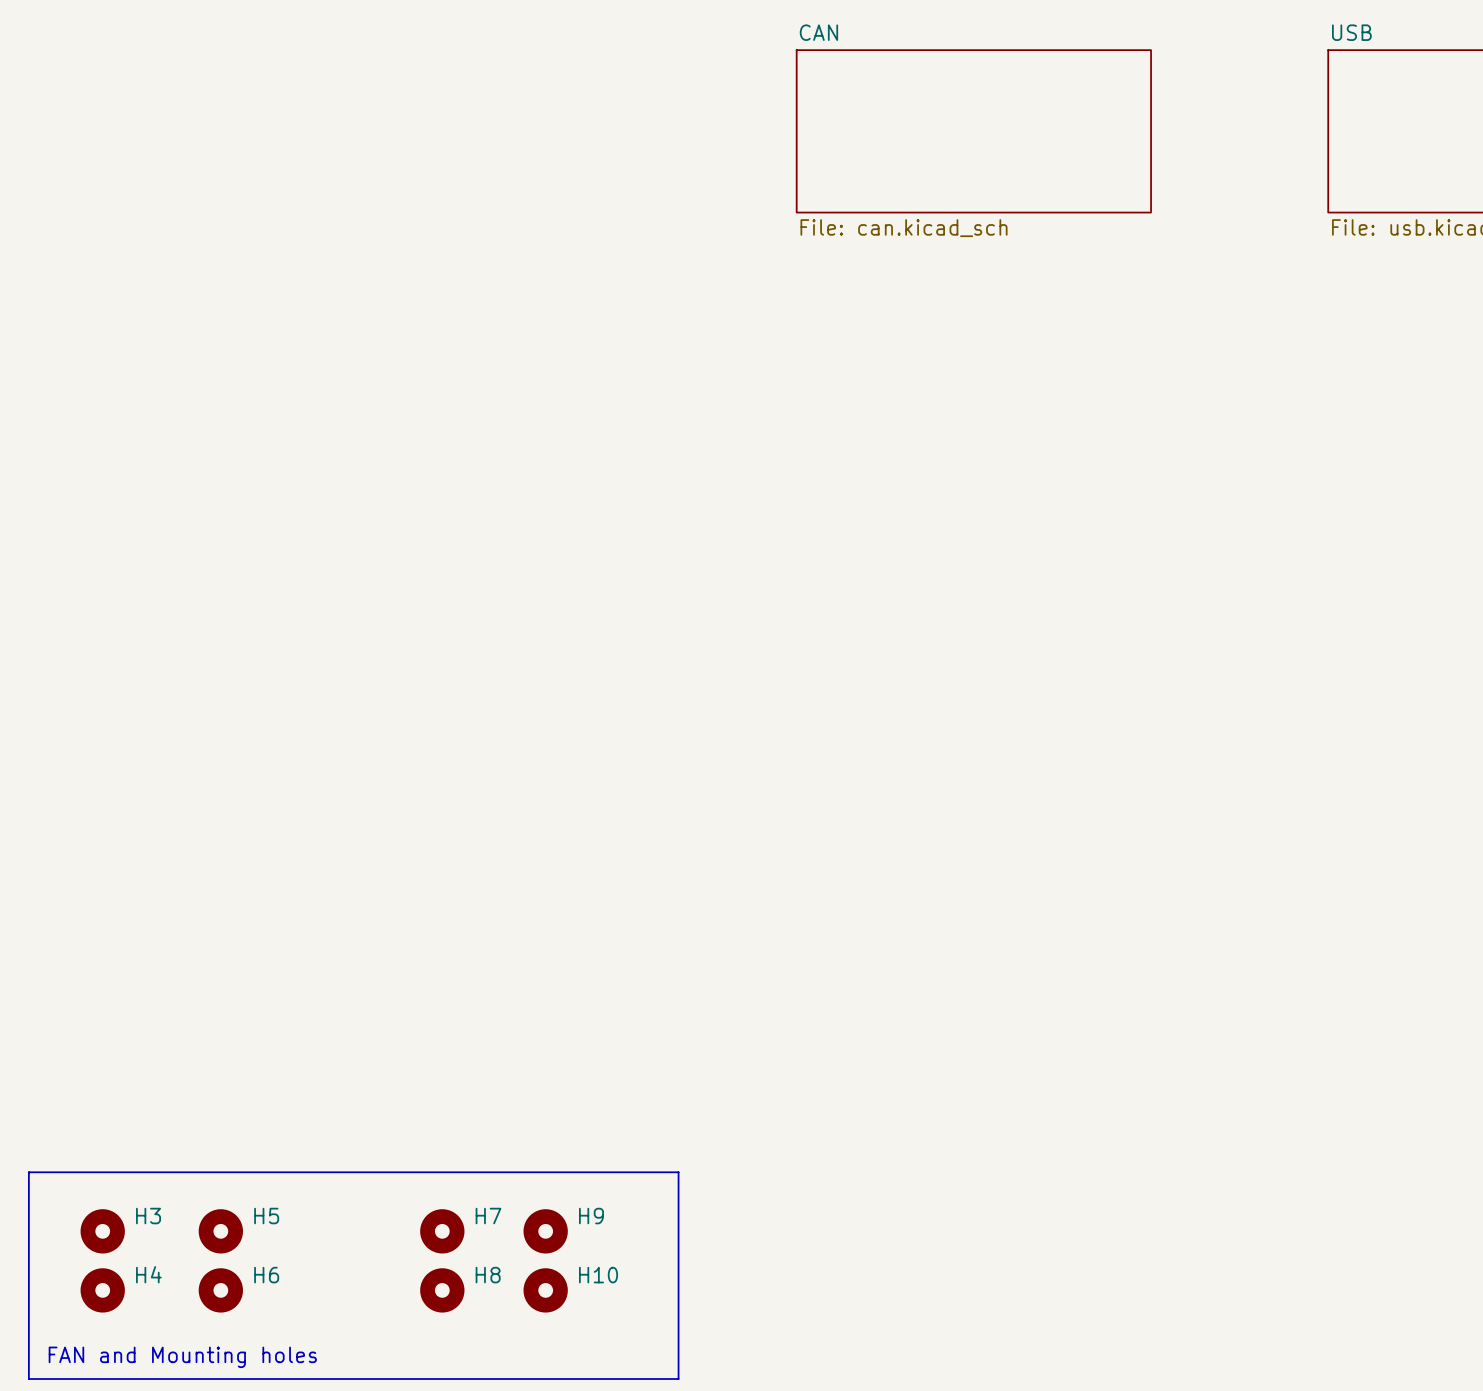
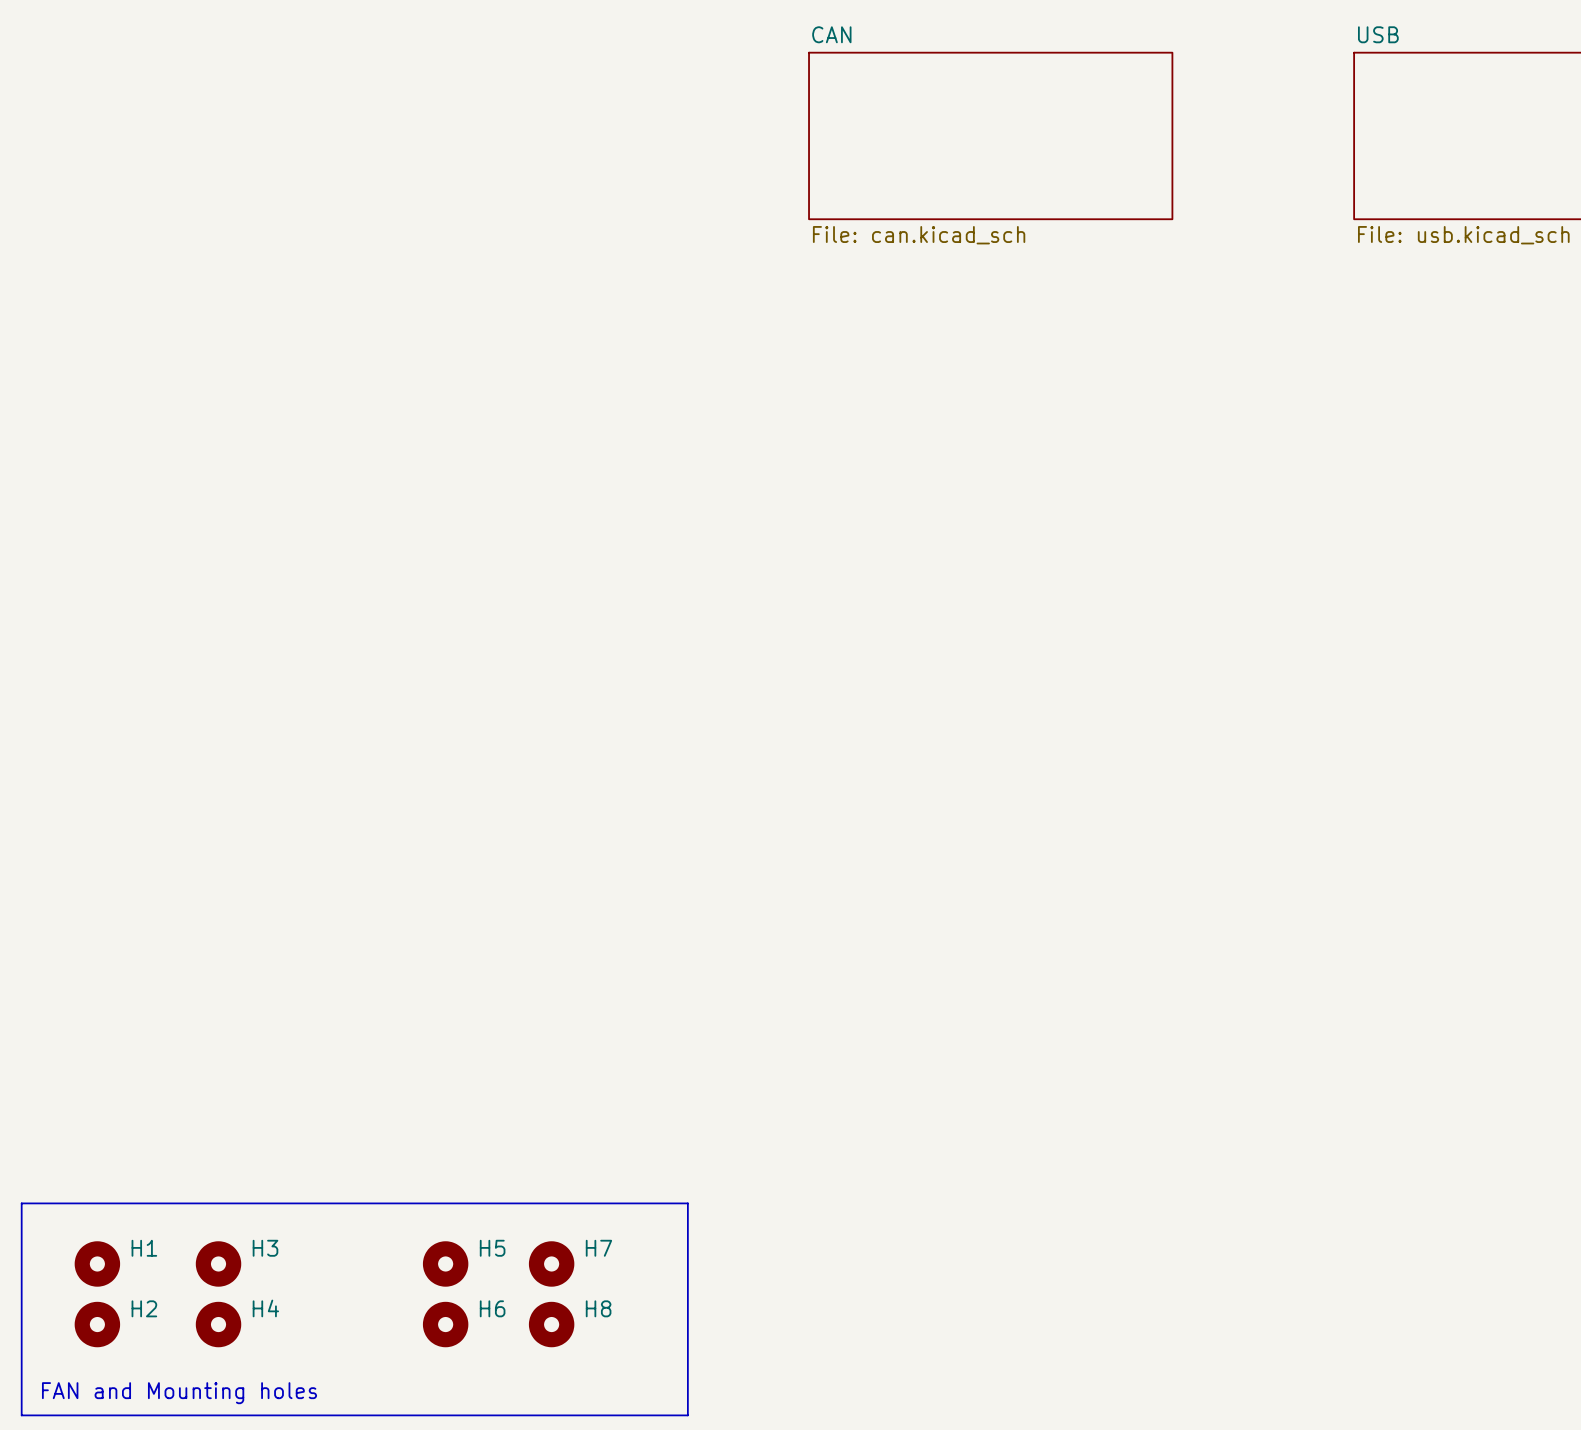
H3 name: H3 (148, 1216) -> H1 (144, 1248)
H5 name: H5 (266, 1216) -> H3 (265, 1248)
H7 name: H7 (488, 1216) -> H5 (492, 1248)
H9 name: H9 (591, 1216) -> H7 (598, 1248)
H4 name: H4 (148, 1274) -> H2 (144, 1308)
H6 name: H6 (266, 1275) -> H4 (265, 1308)
H8 name: H8 (488, 1275) -> H6 (492, 1308)
H10 name: H10 (598, 1275) -> H8 (598, 1308)

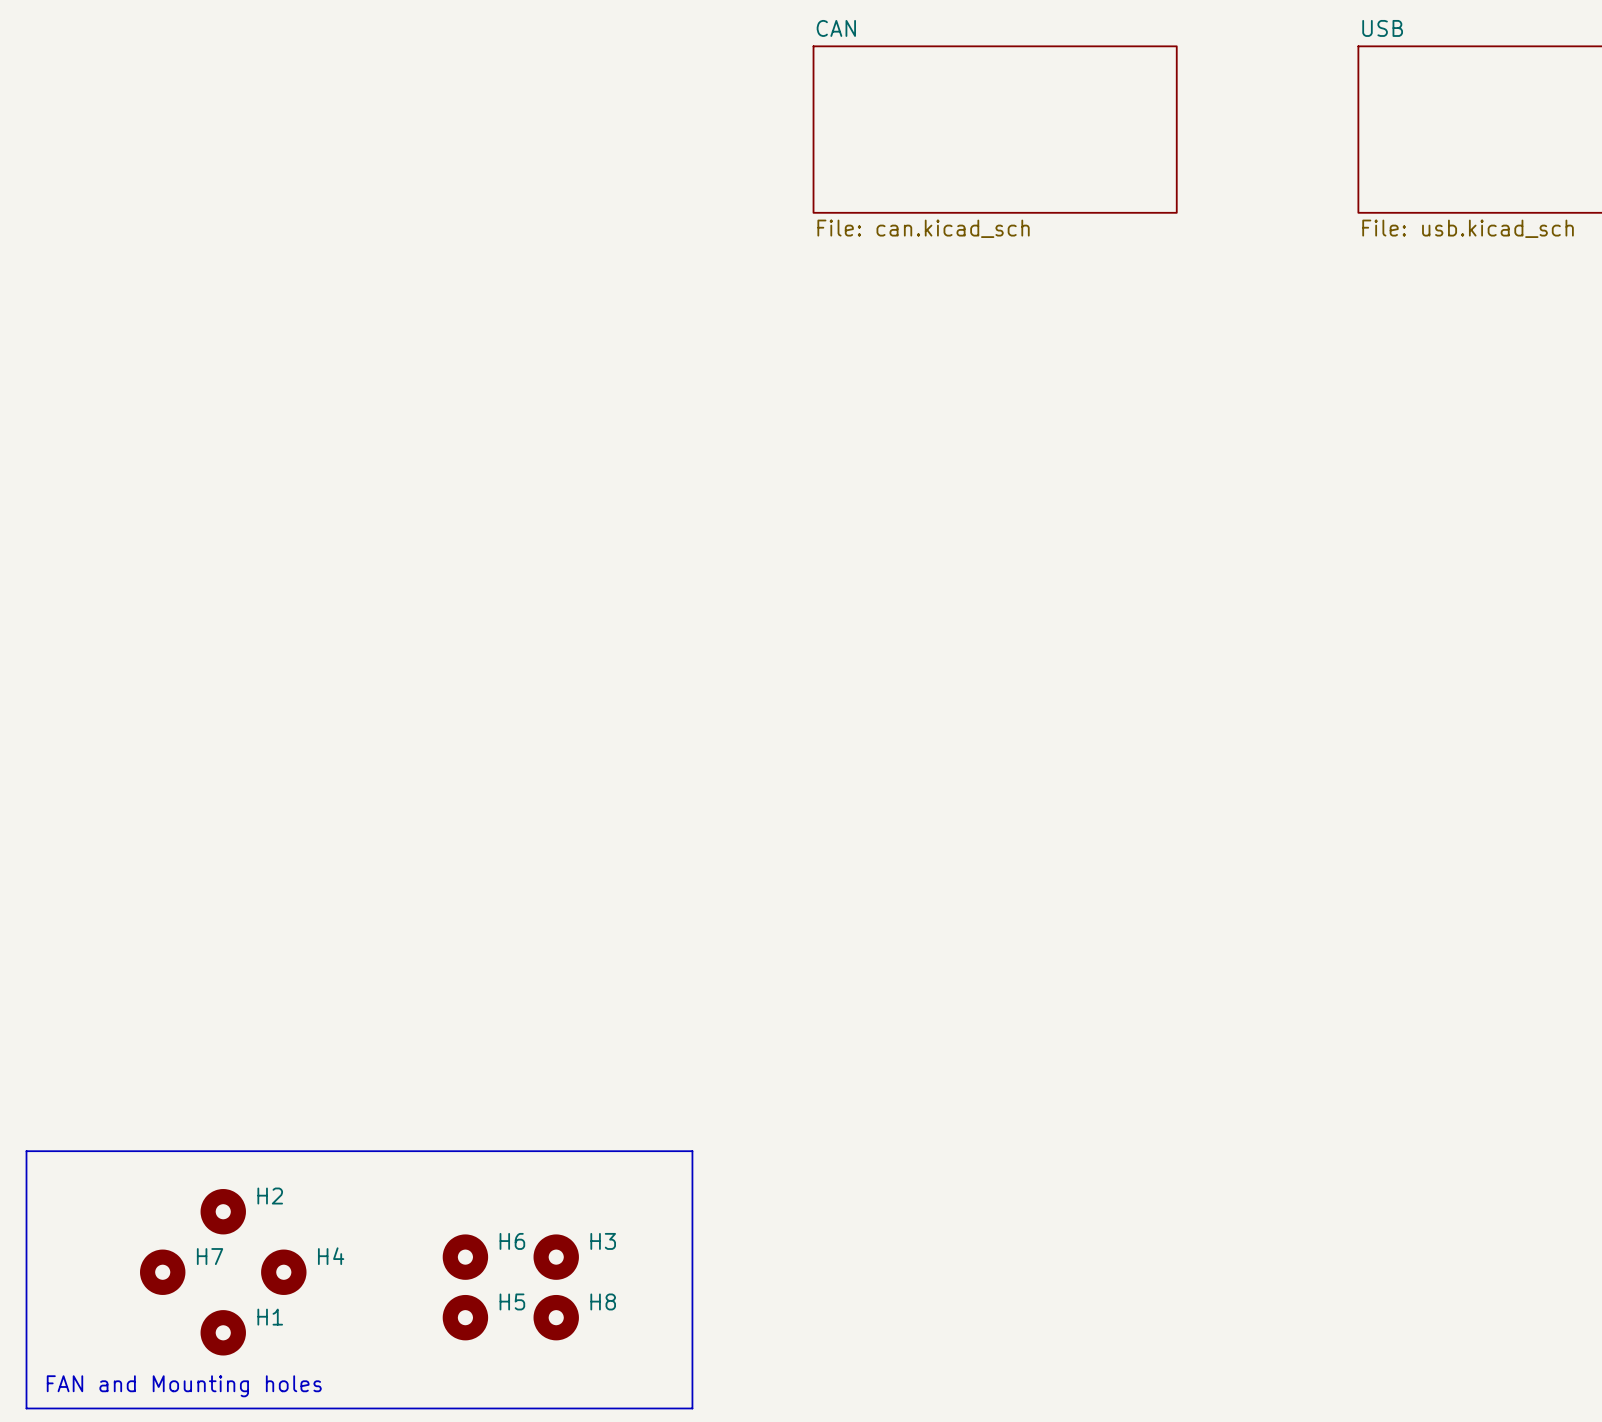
line: (21, 1203) (687, 1203) -> (26, 1196) (26, 1151) (692, 1151) (692, 1196)
H7 name: H7 (598, 1248) -> H3 (603, 1241)
H1 position: (97, 1263) -> (223, 1332)
H3: (218, 1263) -> none
H5 position: (445, 1263) -> (465, 1317)
H7: none -> (162, 1272)
H2 position: (97, 1324) -> (223, 1211)
H4 position: (218, 1324) -> (283, 1272)
H6 position: (445, 1324) -> (465, 1257)

